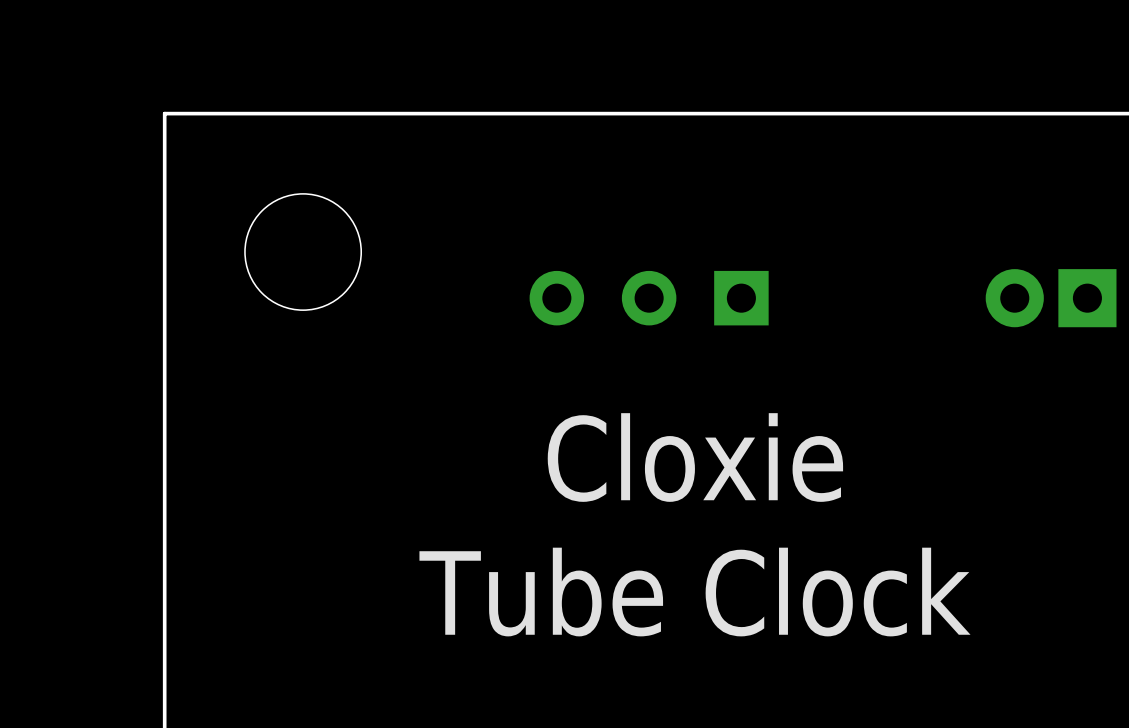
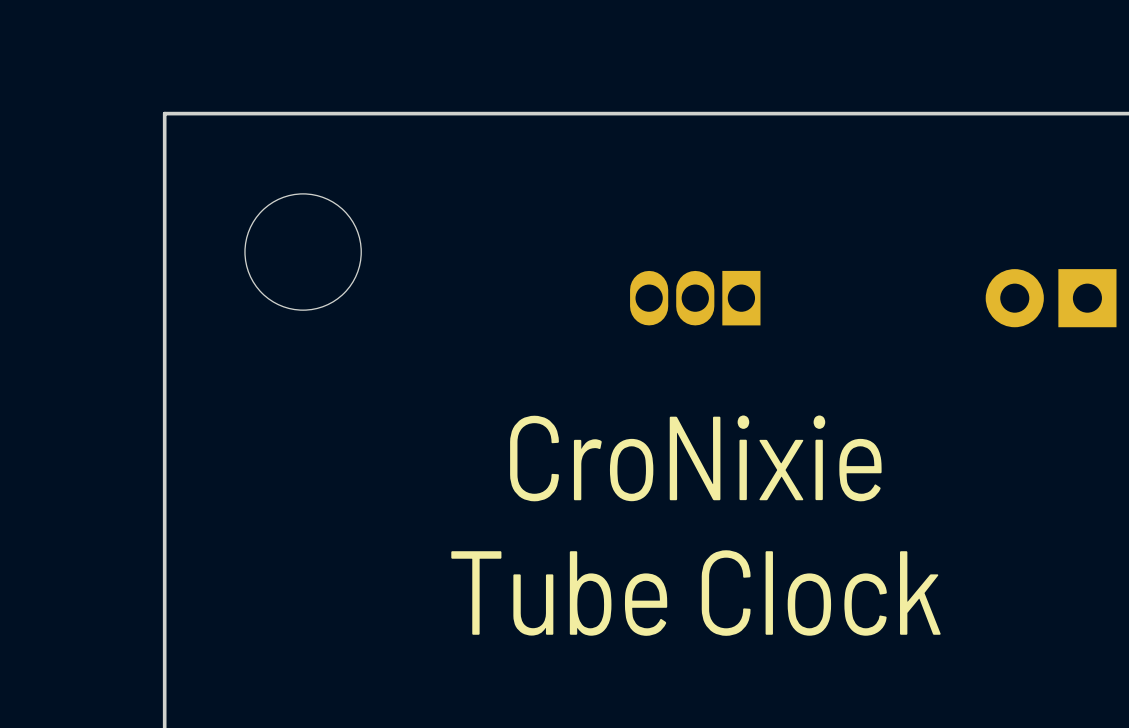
part: (649, 298) -> none
part: none -> (695, 298)
text: Cloxie (695, 457) -> CroNixie (695, 458)

